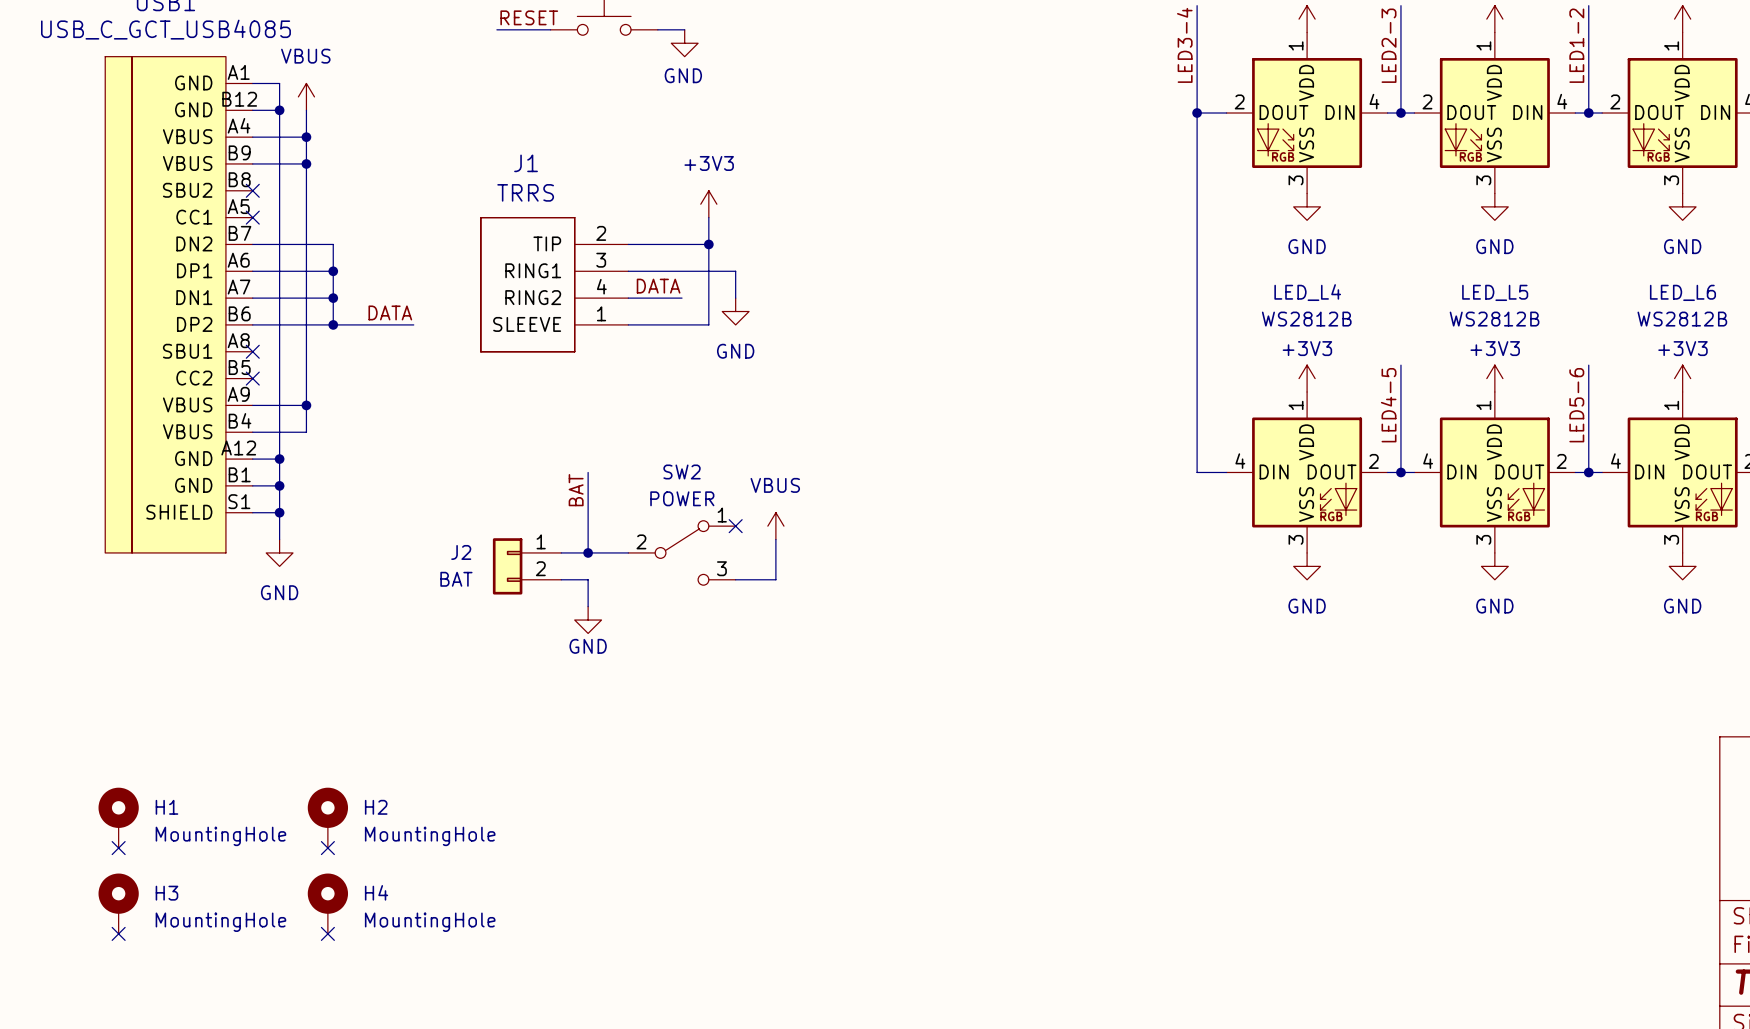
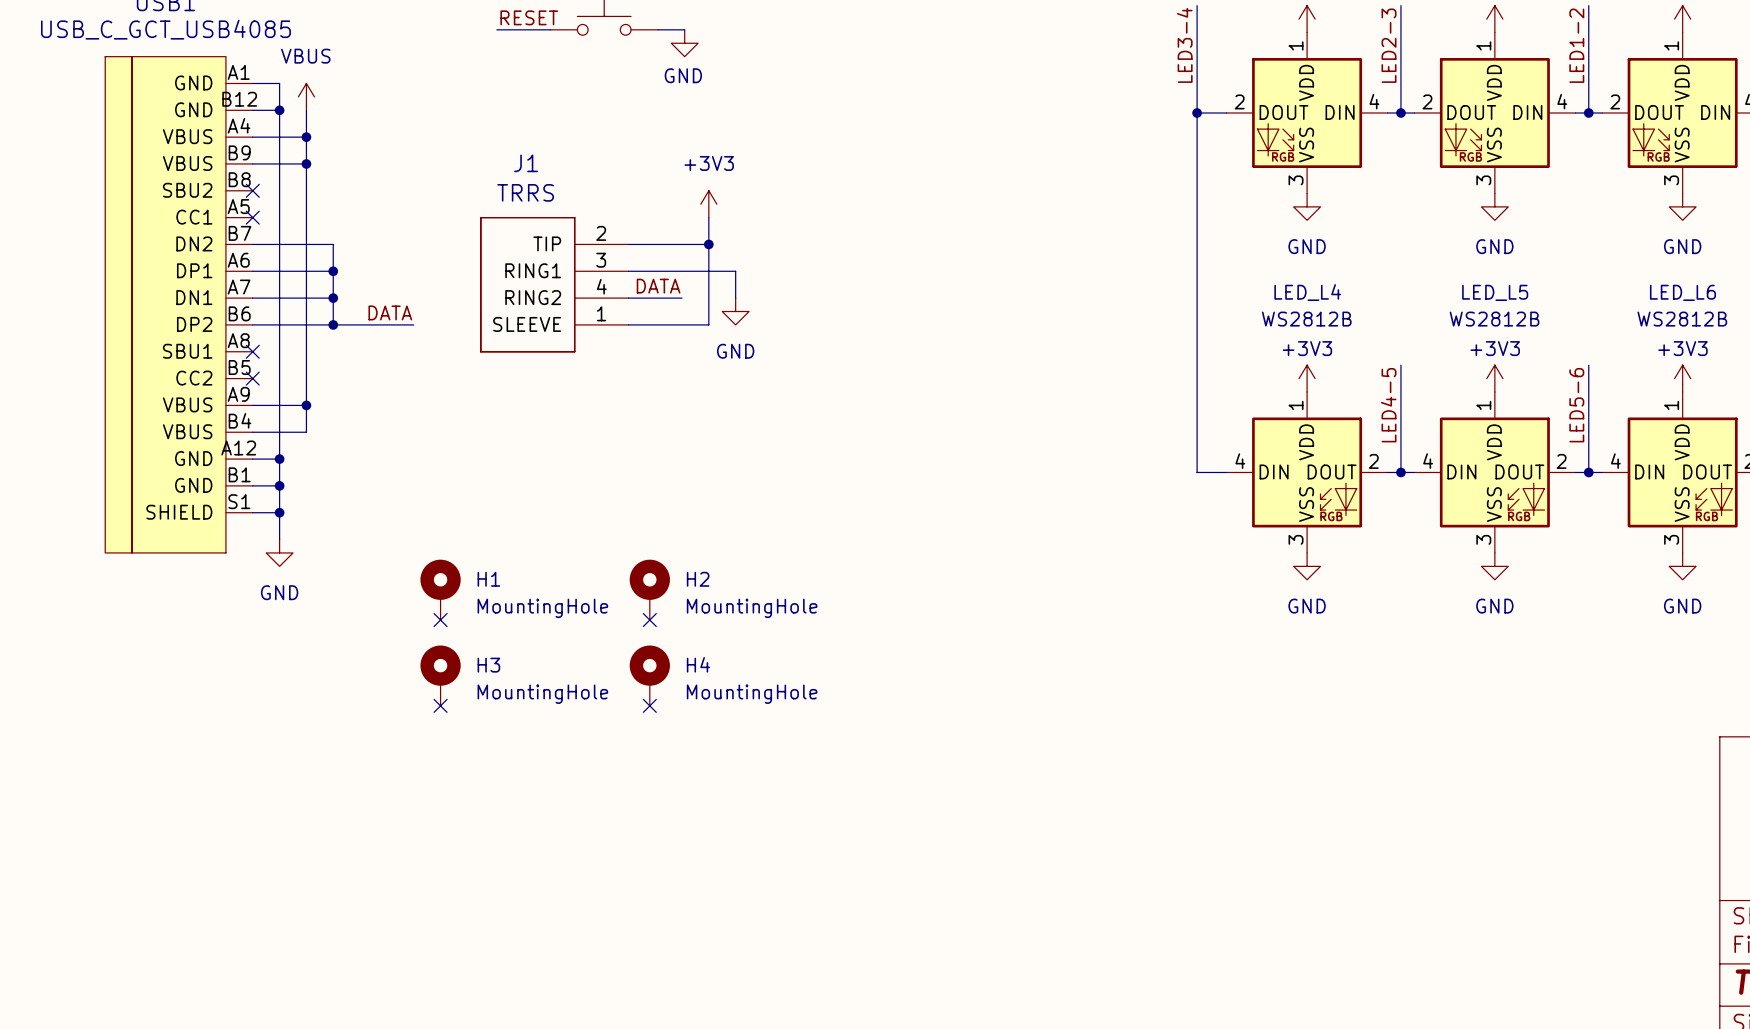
wire: (588, 472) (588, 552) -> none
label: BAT (576, 490) -> none
no-connect mark: (735, 526) -> none
power symbol: VBUS (775, 526) -> none
wire: (775, 539) (775, 579) (735, 579) -> none
wire: (561, 552) (628, 552) -> none
junction: (588, 552) -> none
SW2: POWER (682, 552) -> none
J2: BAT (527, 566) -> none
wire: (561, 579) (588, 579) (588, 606) -> none
no-connect mark: none -> (440, 620)
power symbol: GND (588, 620) -> none
no-connect mark: none -> (649, 620)
no-connect mark: none -> (440, 705)
no-connect mark: none -> (649, 705)
H1 position: (118, 817) -> (440, 589)
H2 position: (327, 817) -> (649, 589)
no-connect mark: (118, 848) -> none
no-connect mark: (327, 848) -> none
H3 position: (118, 903) -> (440, 675)
H4 position: (327, 903) -> (649, 675)
no-connect mark: (118, 933) -> none
no-connect mark: (327, 933) -> none

